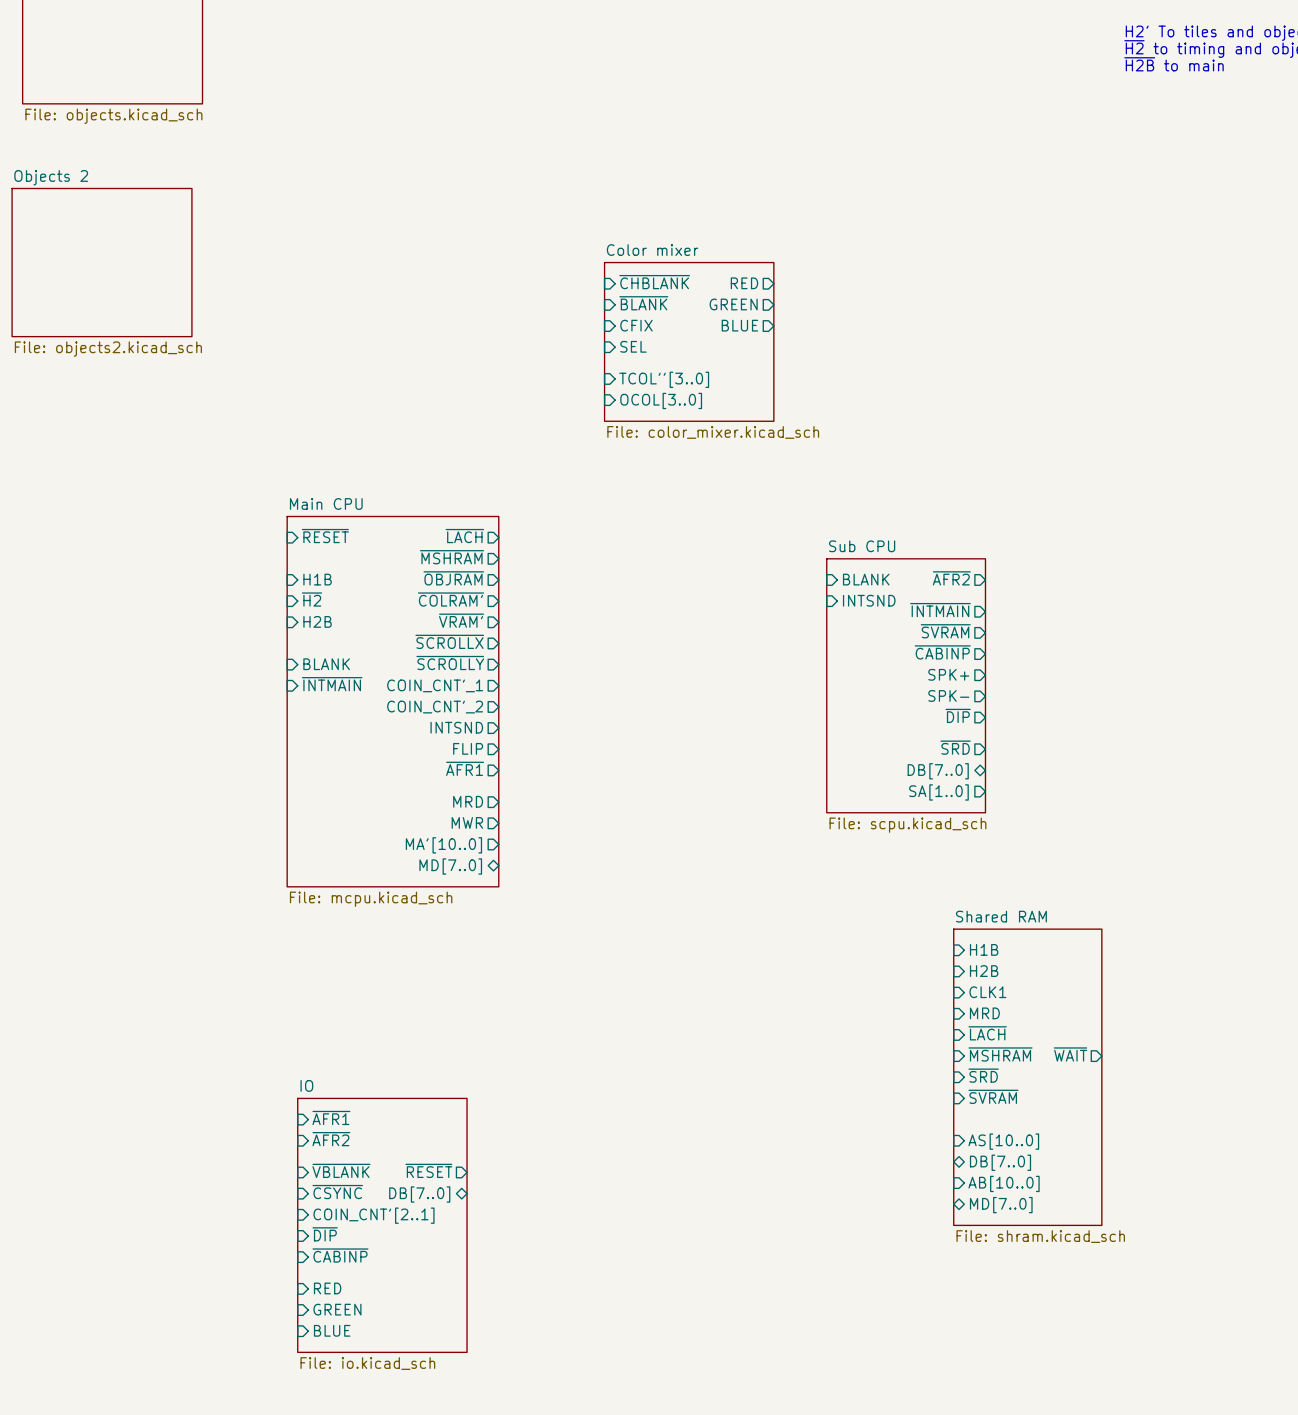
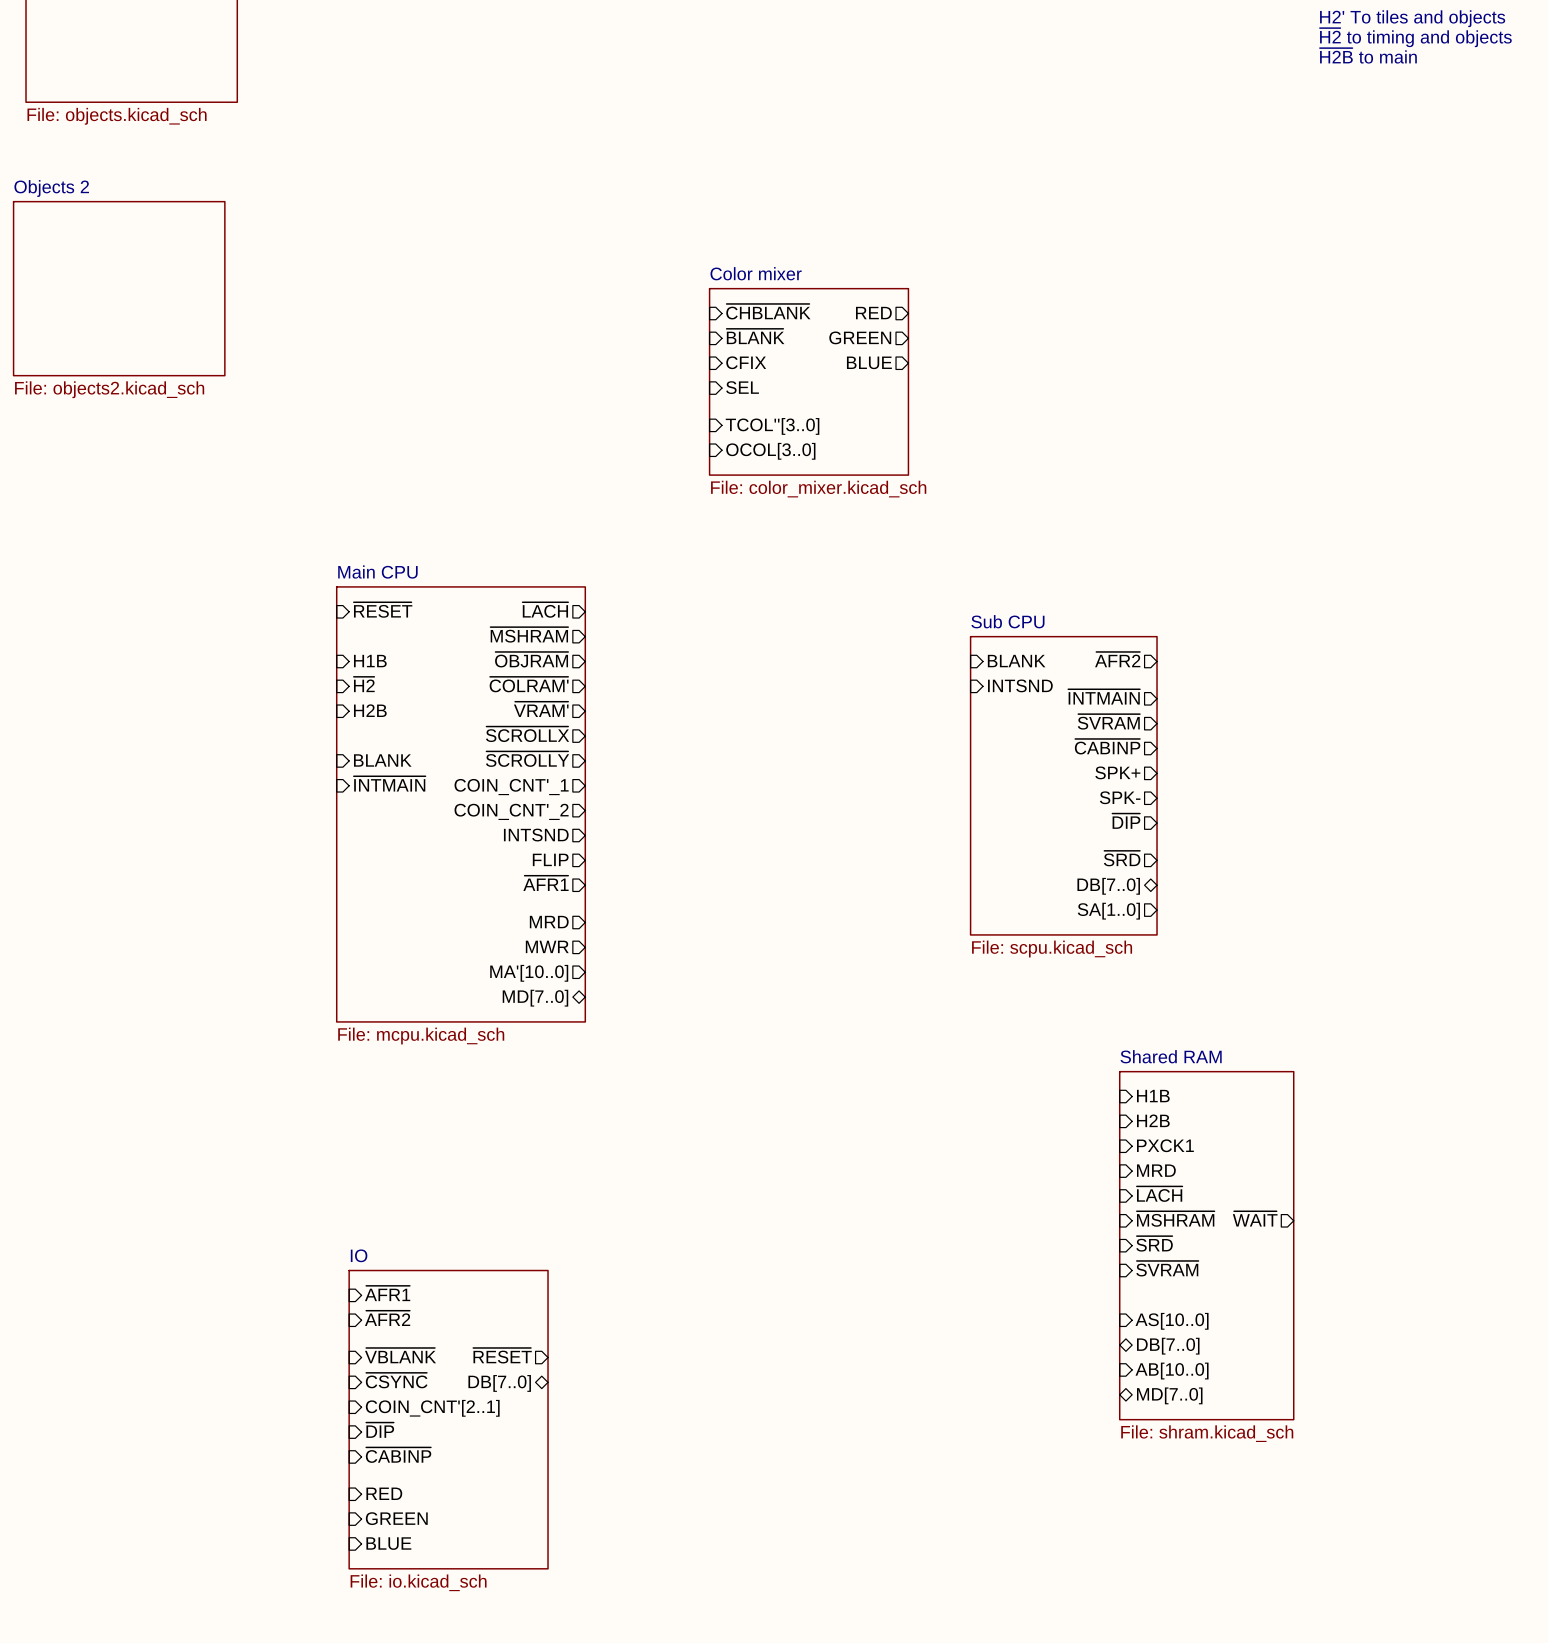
sheet pin: CLK1 (987, 992) -> PXCK1 (1165, 1145)

